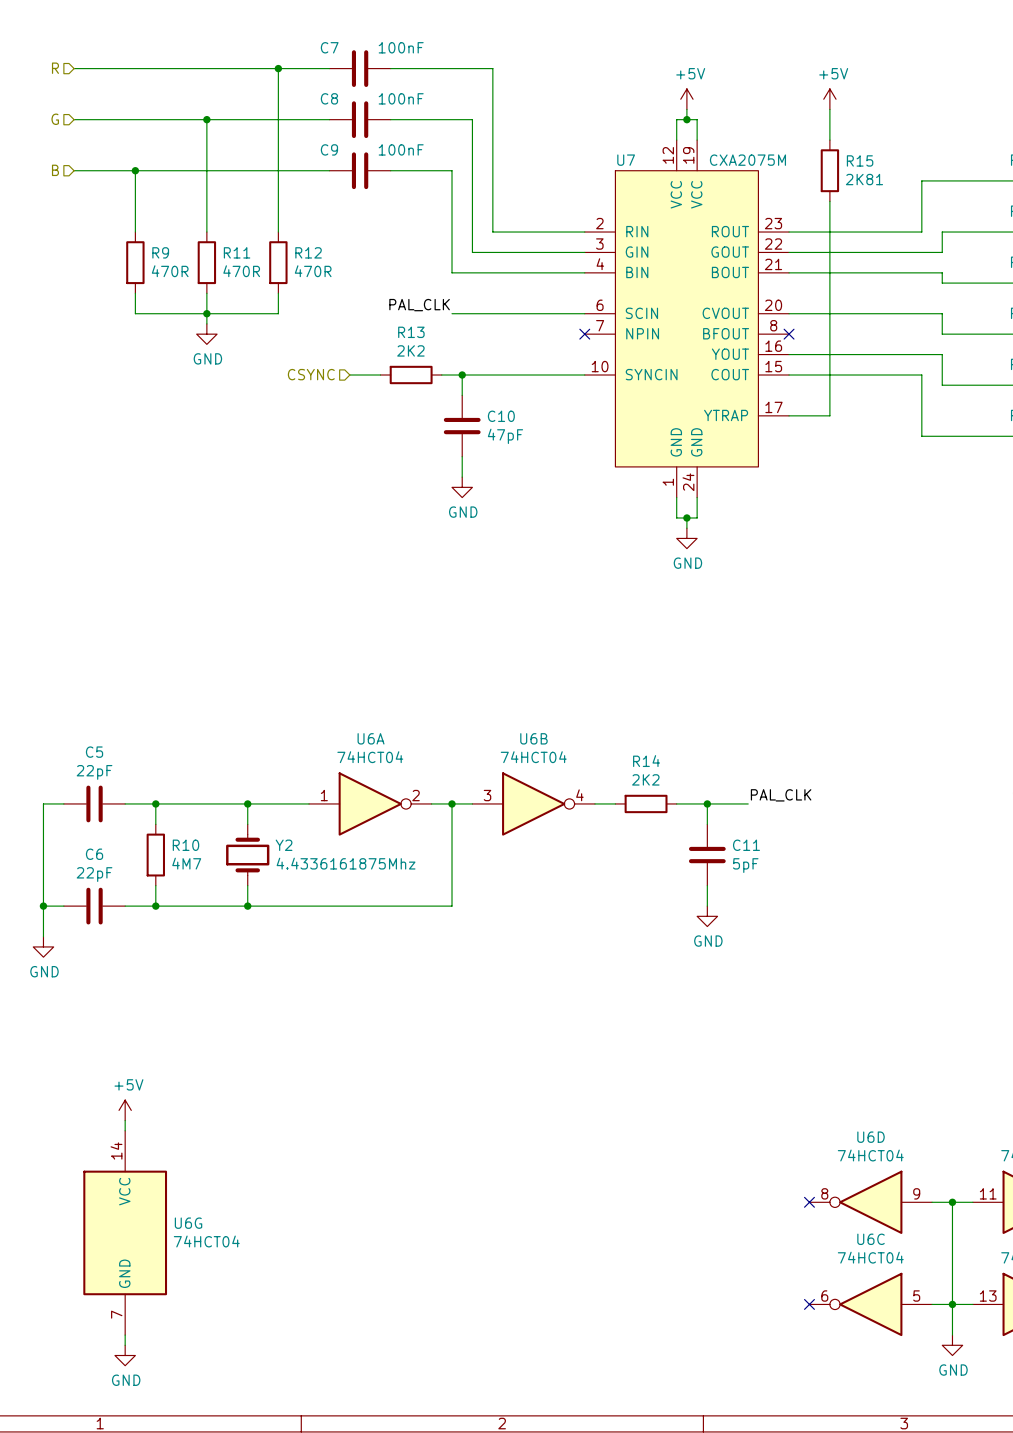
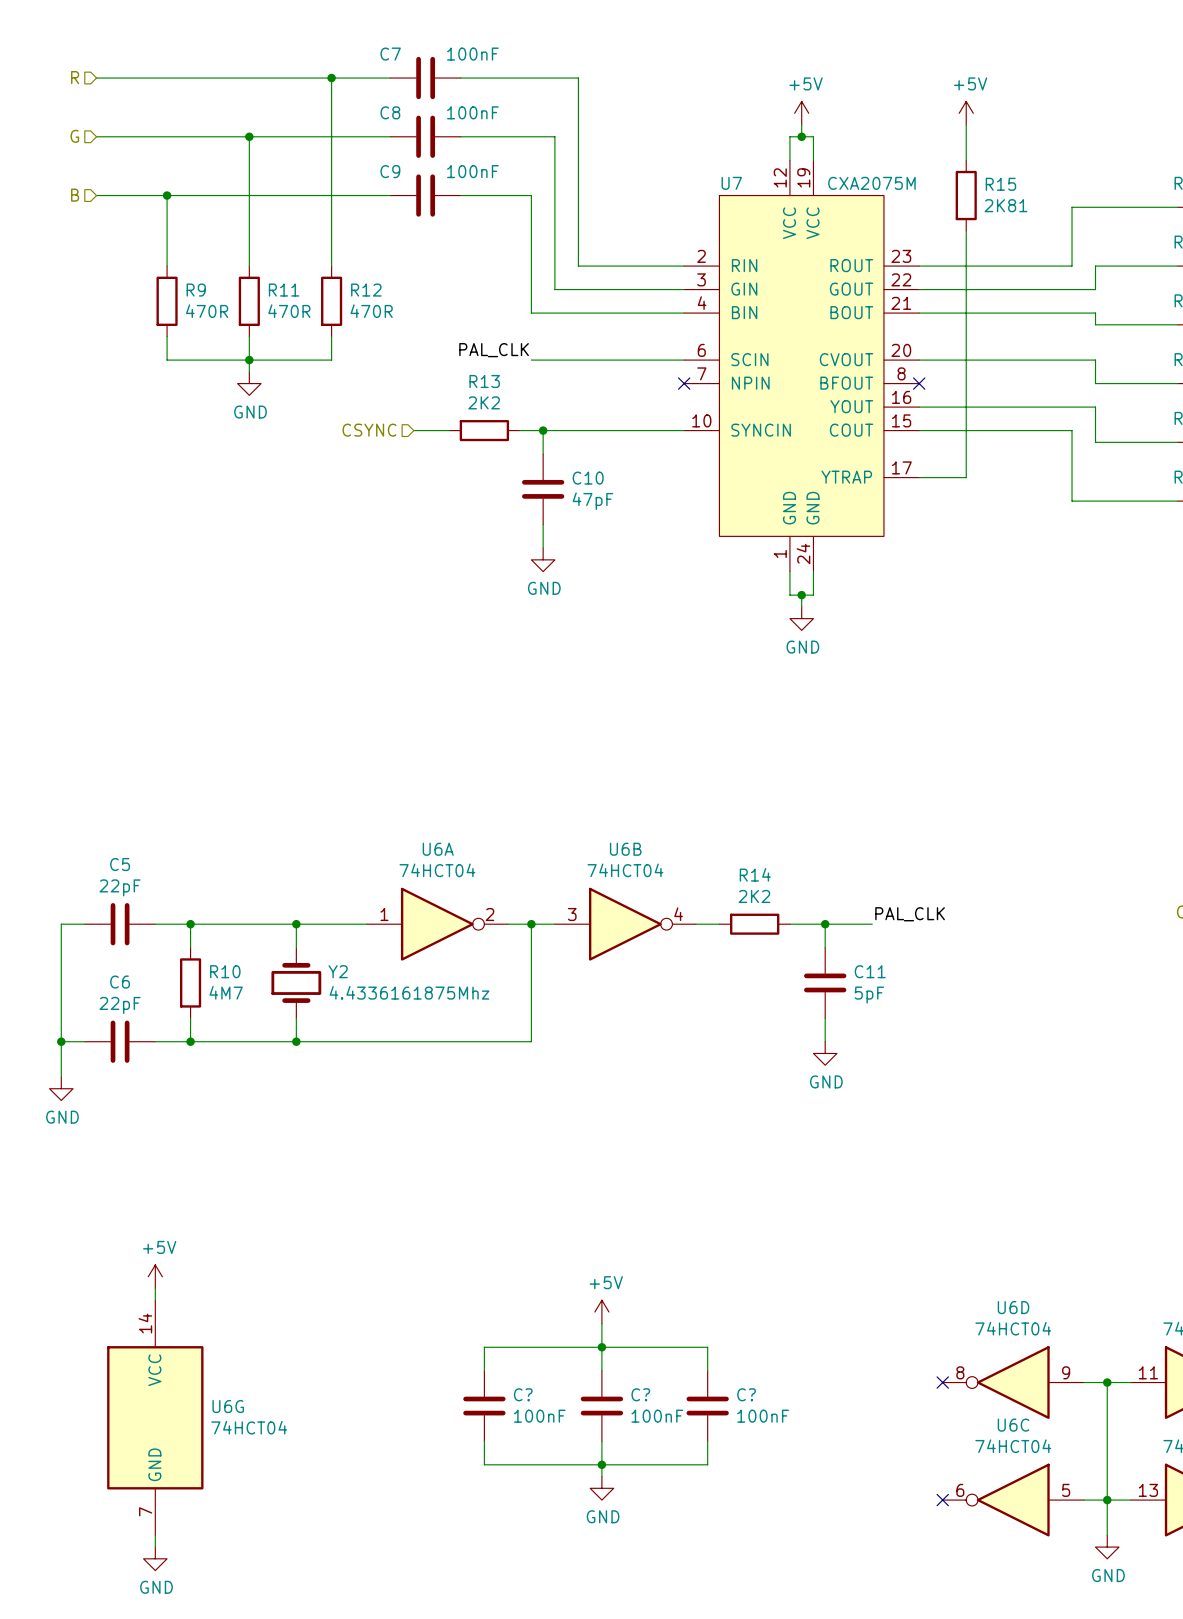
power symbol: none -> +5V (601, 1312)
wire: none -> (601, 1323) (601, 1370)
junction: none -> (601, 1347)
wire: none -> (484, 1370) (484, 1347) (707, 1347) (707, 1370)
C?: none -> 100nF (484, 1406)
C?: none -> 100nF (601, 1406)
C?: none -> 100nF (707, 1406)
wire: none -> (484, 1441) (484, 1464) (707, 1464) (707, 1441)
wire: none -> (601, 1441) (601, 1476)
junction: none -> (601, 1464)
power symbol: none -> GND (601, 1488)

